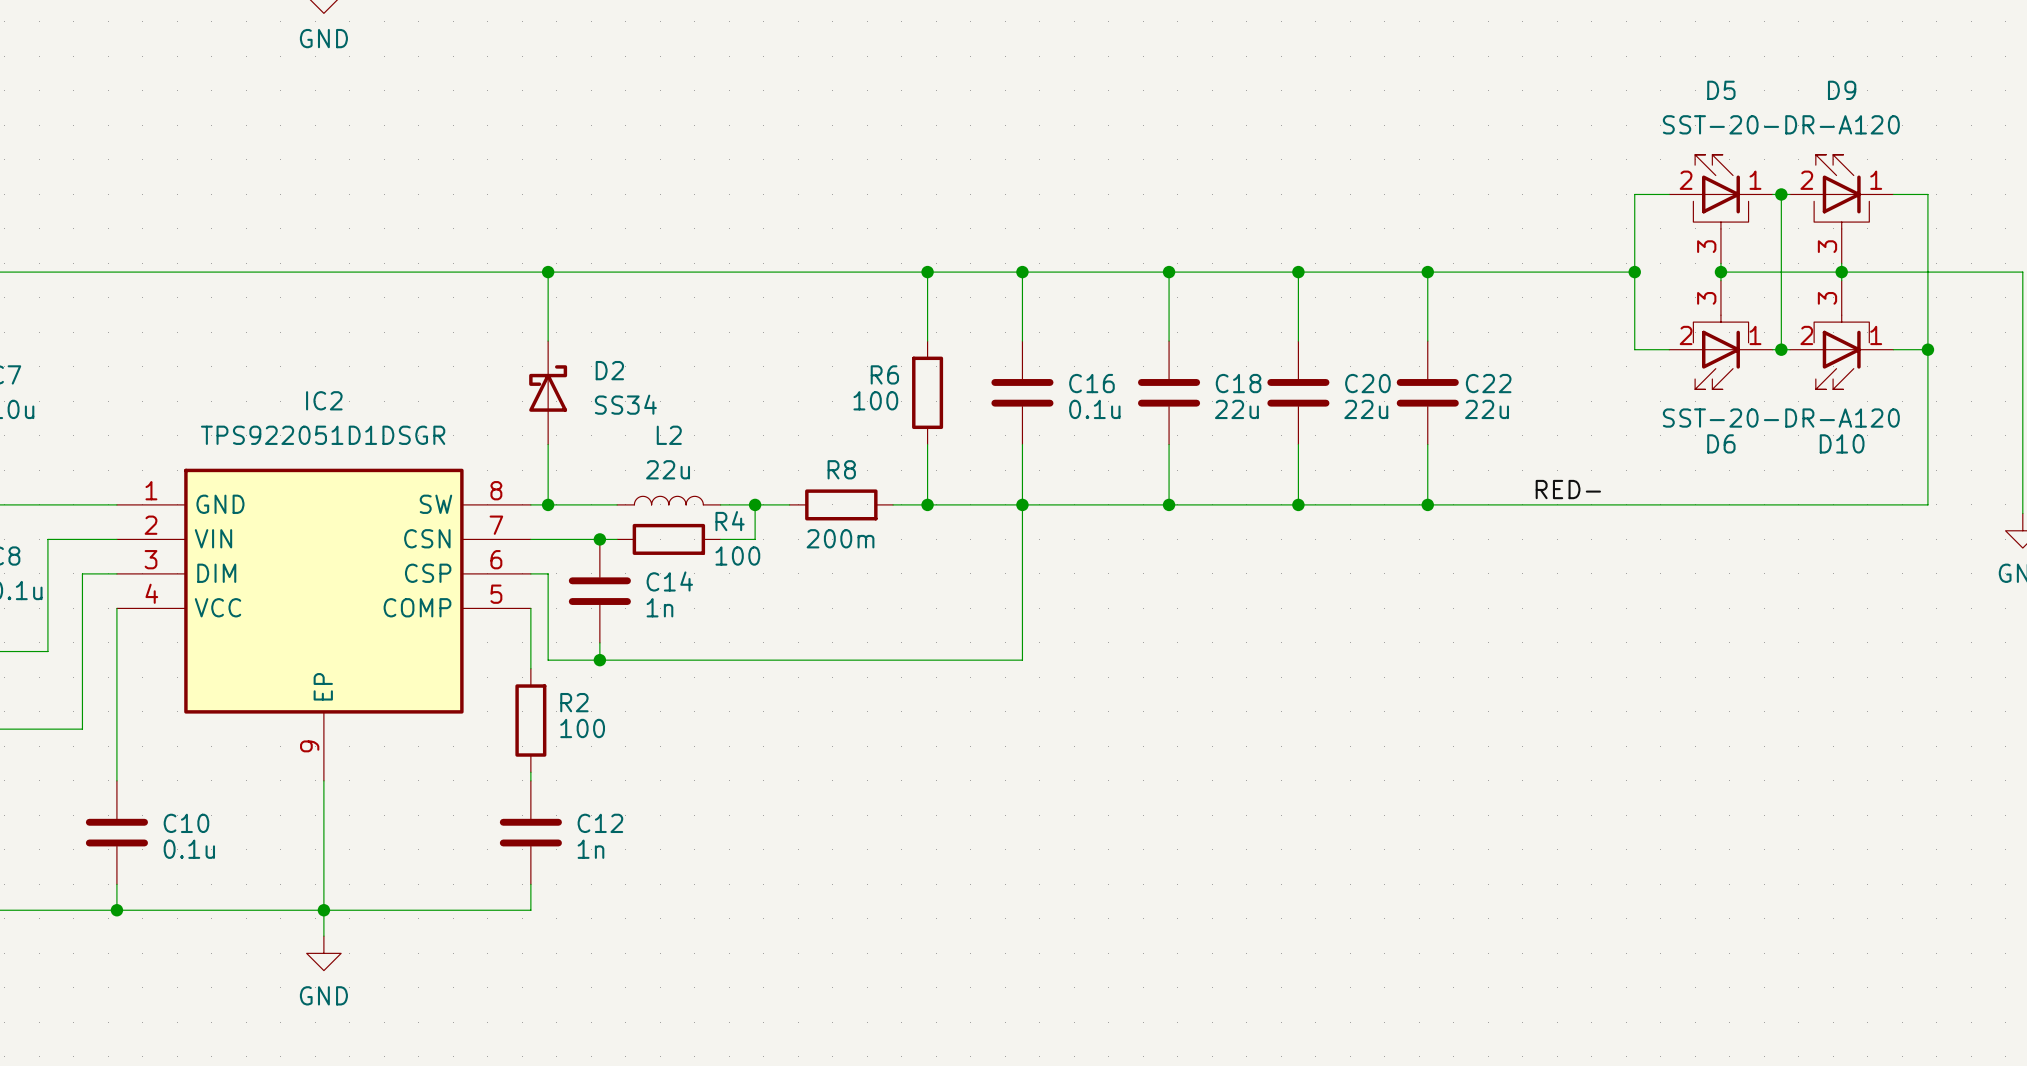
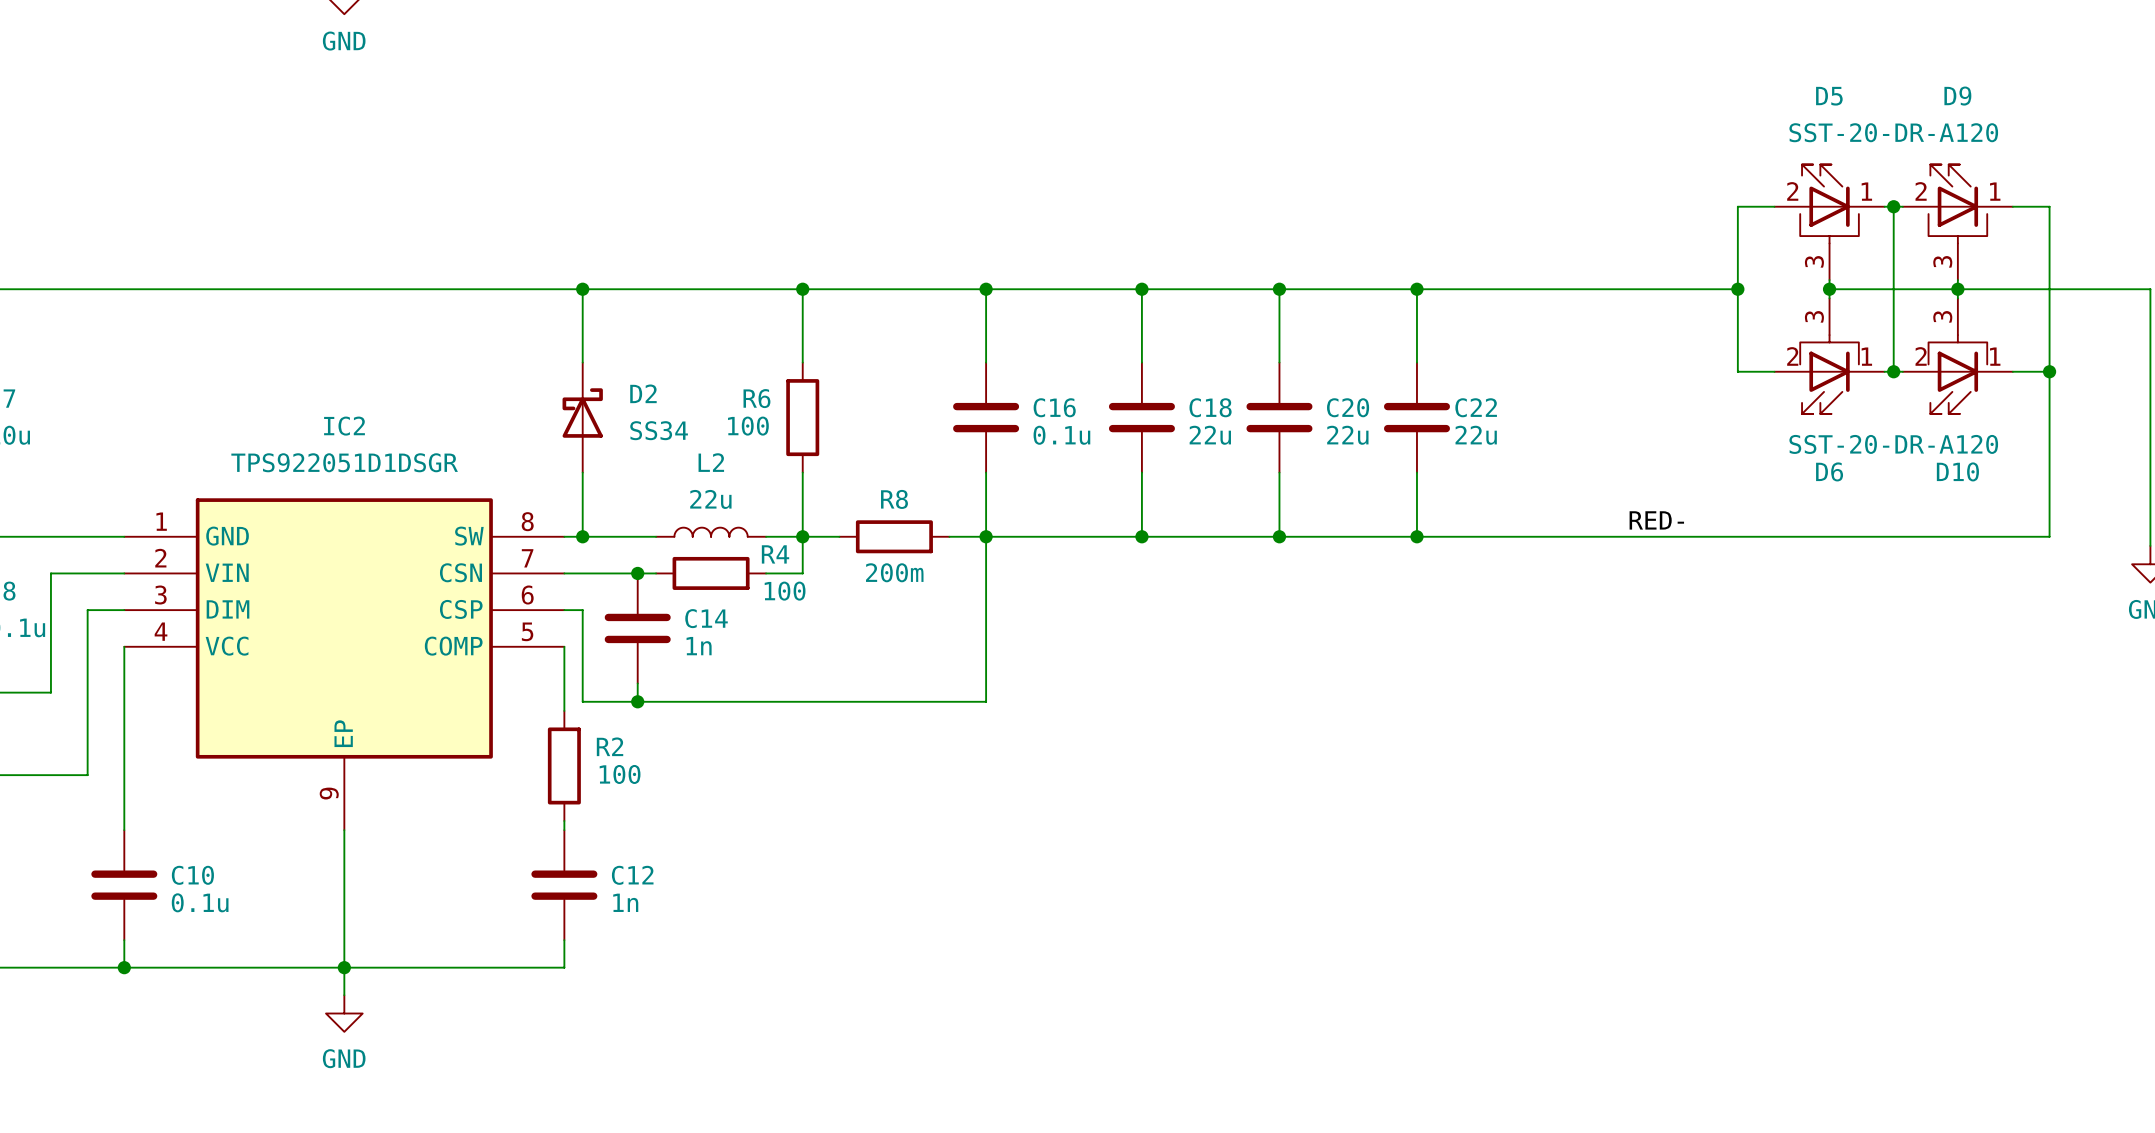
junction: none -> (802, 289)
wire: (1022, 272) (1022, 341) -> (802, 289) (802, 362)
junction: (1022, 272) -> none
junction: none -> (1141, 289)
wire: (1169, 272) (1169, 341) -> (1141, 289) (1141, 362)
junction position: (1169, 272) -> (1279, 289)
wire: (1298, 272) (1298, 341) -> (1279, 289) (1279, 362)
junction position: (1298, 272) -> (1416, 289)
wire: (1427, 272) (1427, 341) -> (1416, 289) (1416, 362)
junction: (1427, 272) -> none
R6 position: (927, 392) -> (802, 417)
C16 position: (1022, 392) -> (986, 417)
C18 position: (1169, 392) -> (1141, 417)
C20 position: (1298, 392) -> (1279, 417)
C22 position: (1427, 392) -> (1416, 417)
wire: none -> (802, 472) (802, 536)
wire: (1022, 444) (1022, 660) (927, 660) -> (986, 536) (986, 701)
wire: (1169, 444) (1169, 504) -> (1141, 472) (1141, 536)
wire: (1298, 444) (1298, 504) -> (1279, 472) (1279, 536)
wire: (1427, 444) (1427, 504) -> (1416, 472) (1416, 536)
junction: (1022, 504) -> none
junction: none -> (1141, 536)
junction position: (1169, 504) -> (1279, 536)
junction position: (1298, 504) -> (1416, 536)
junction: (1427, 504) -> none

